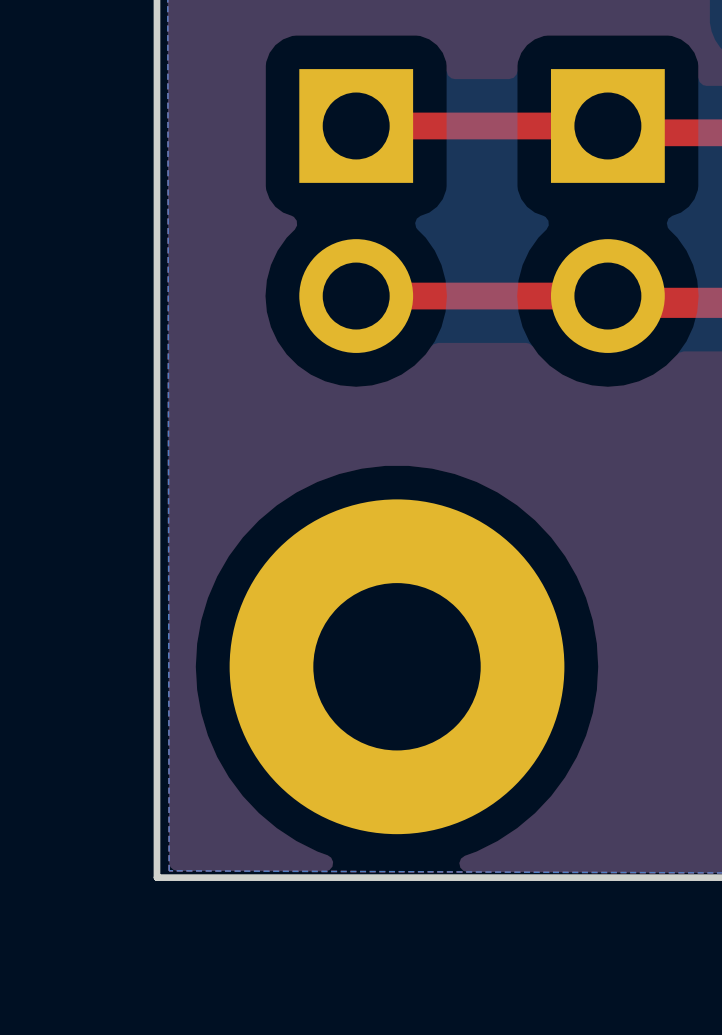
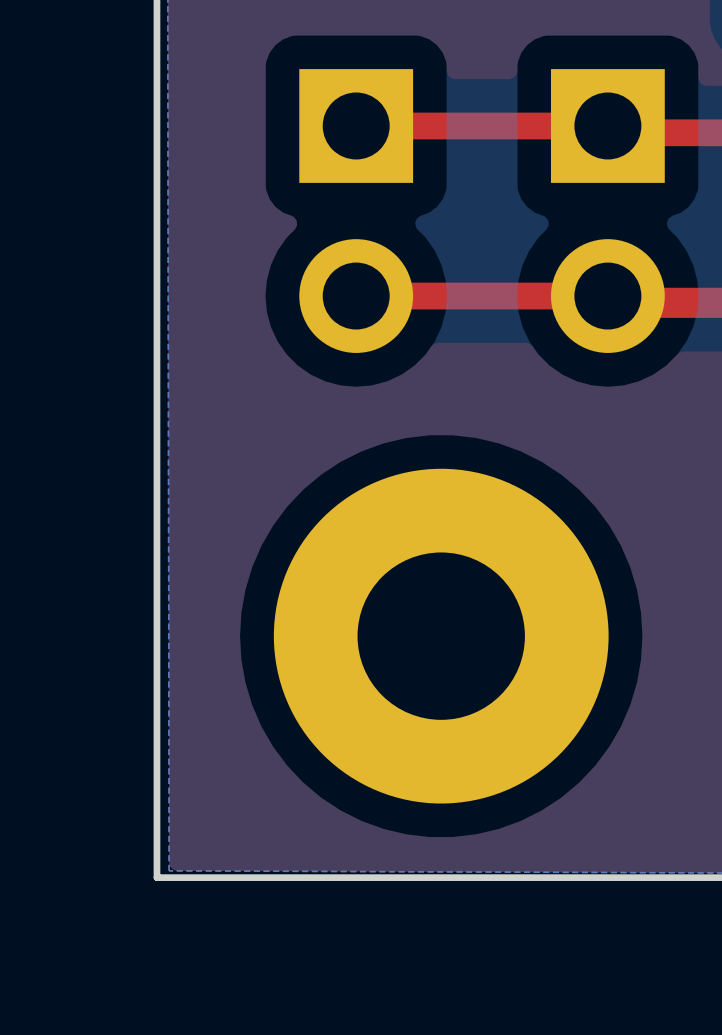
part position: (397, 666) -> (441, 636)

